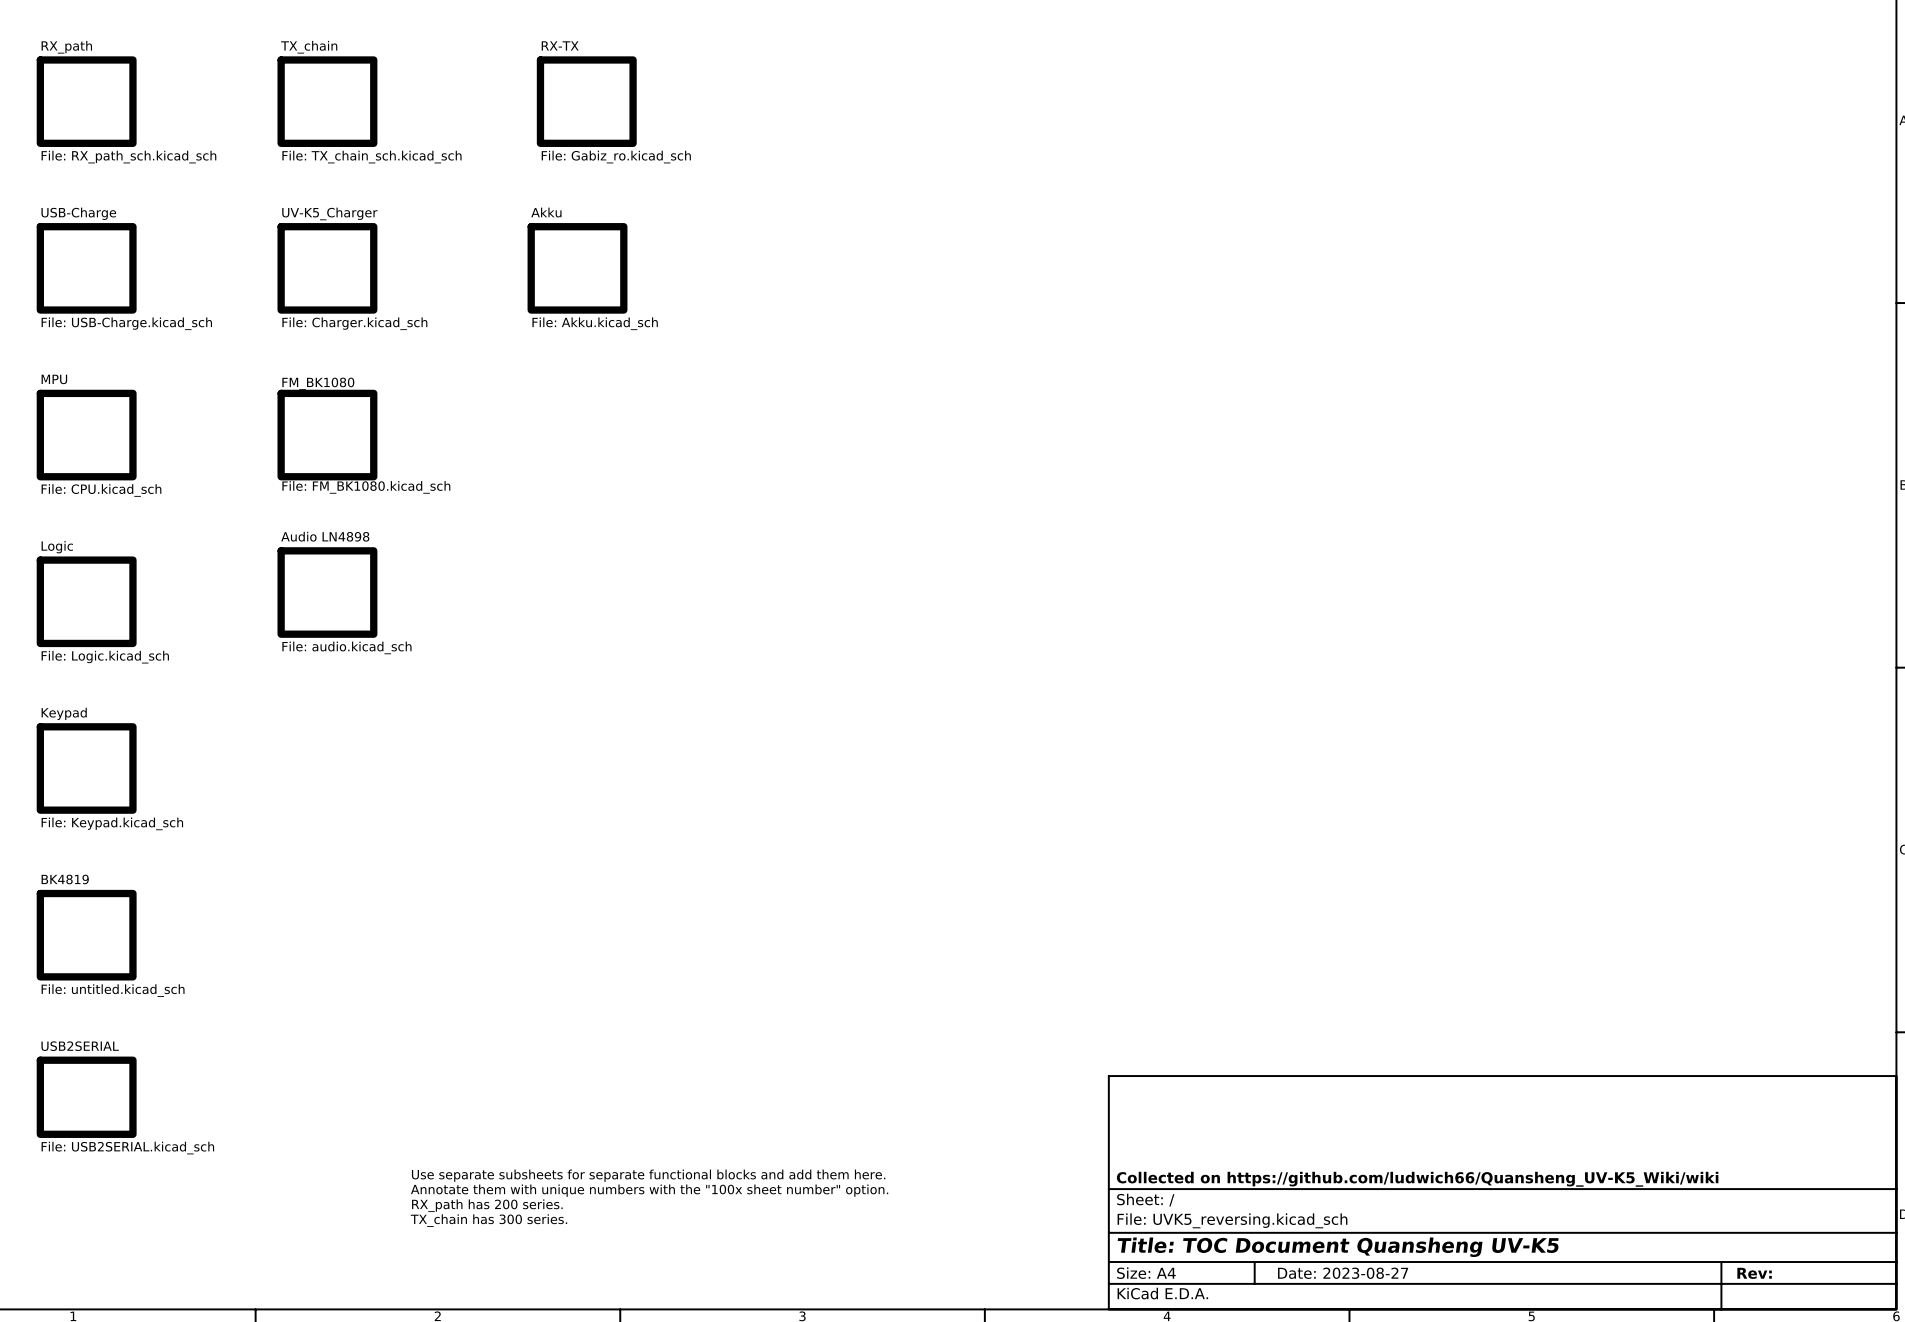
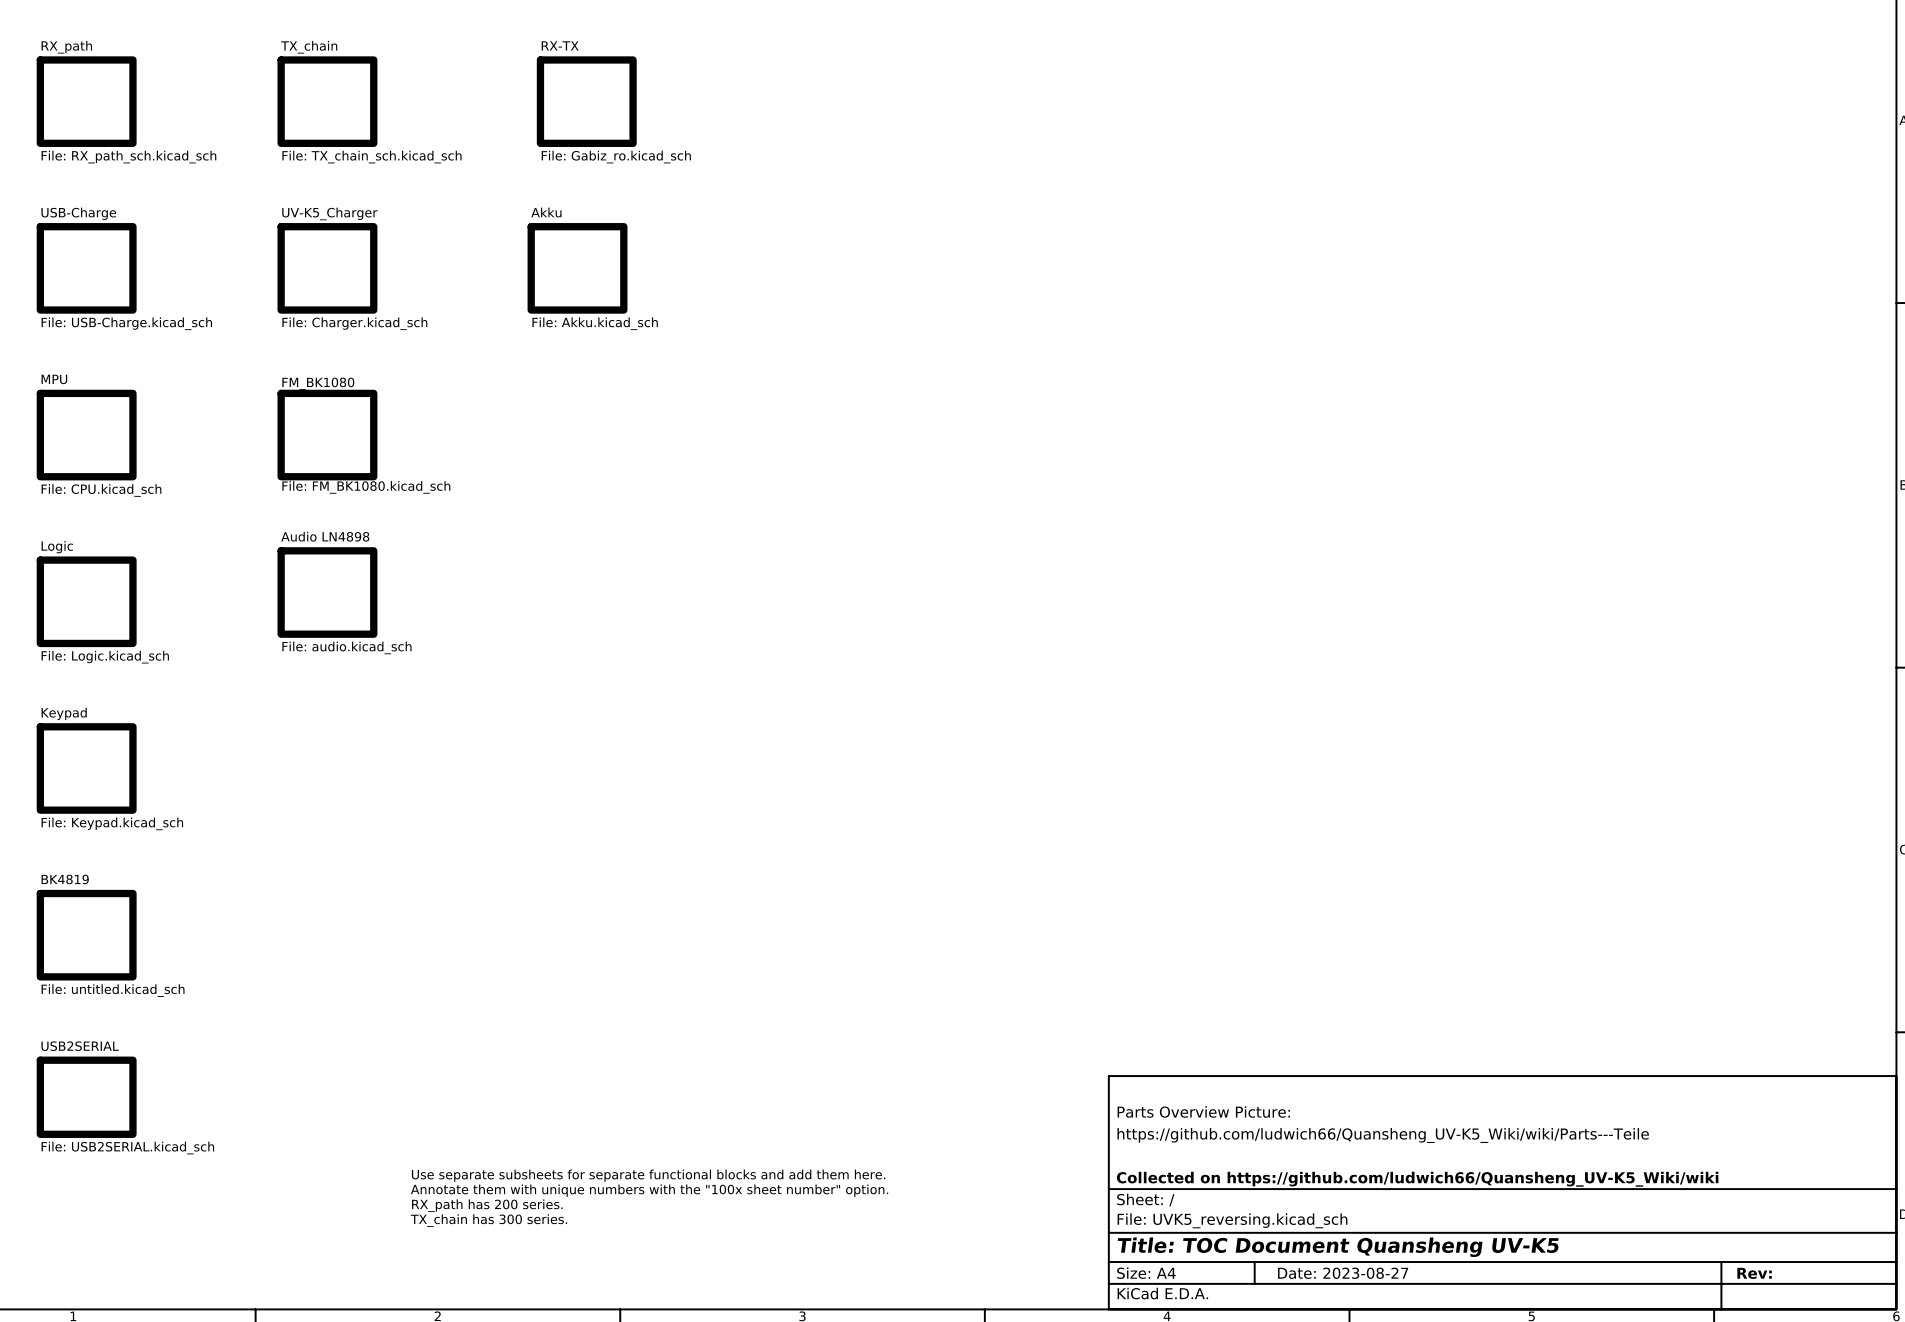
title block: none -> Parts Overview Picture: (1203, 1111)
title block: none -> https://github.com/ludwich66/Quansheng_UV-K5_Wiki/wiki/Parts---Teile (1383, 1135)

